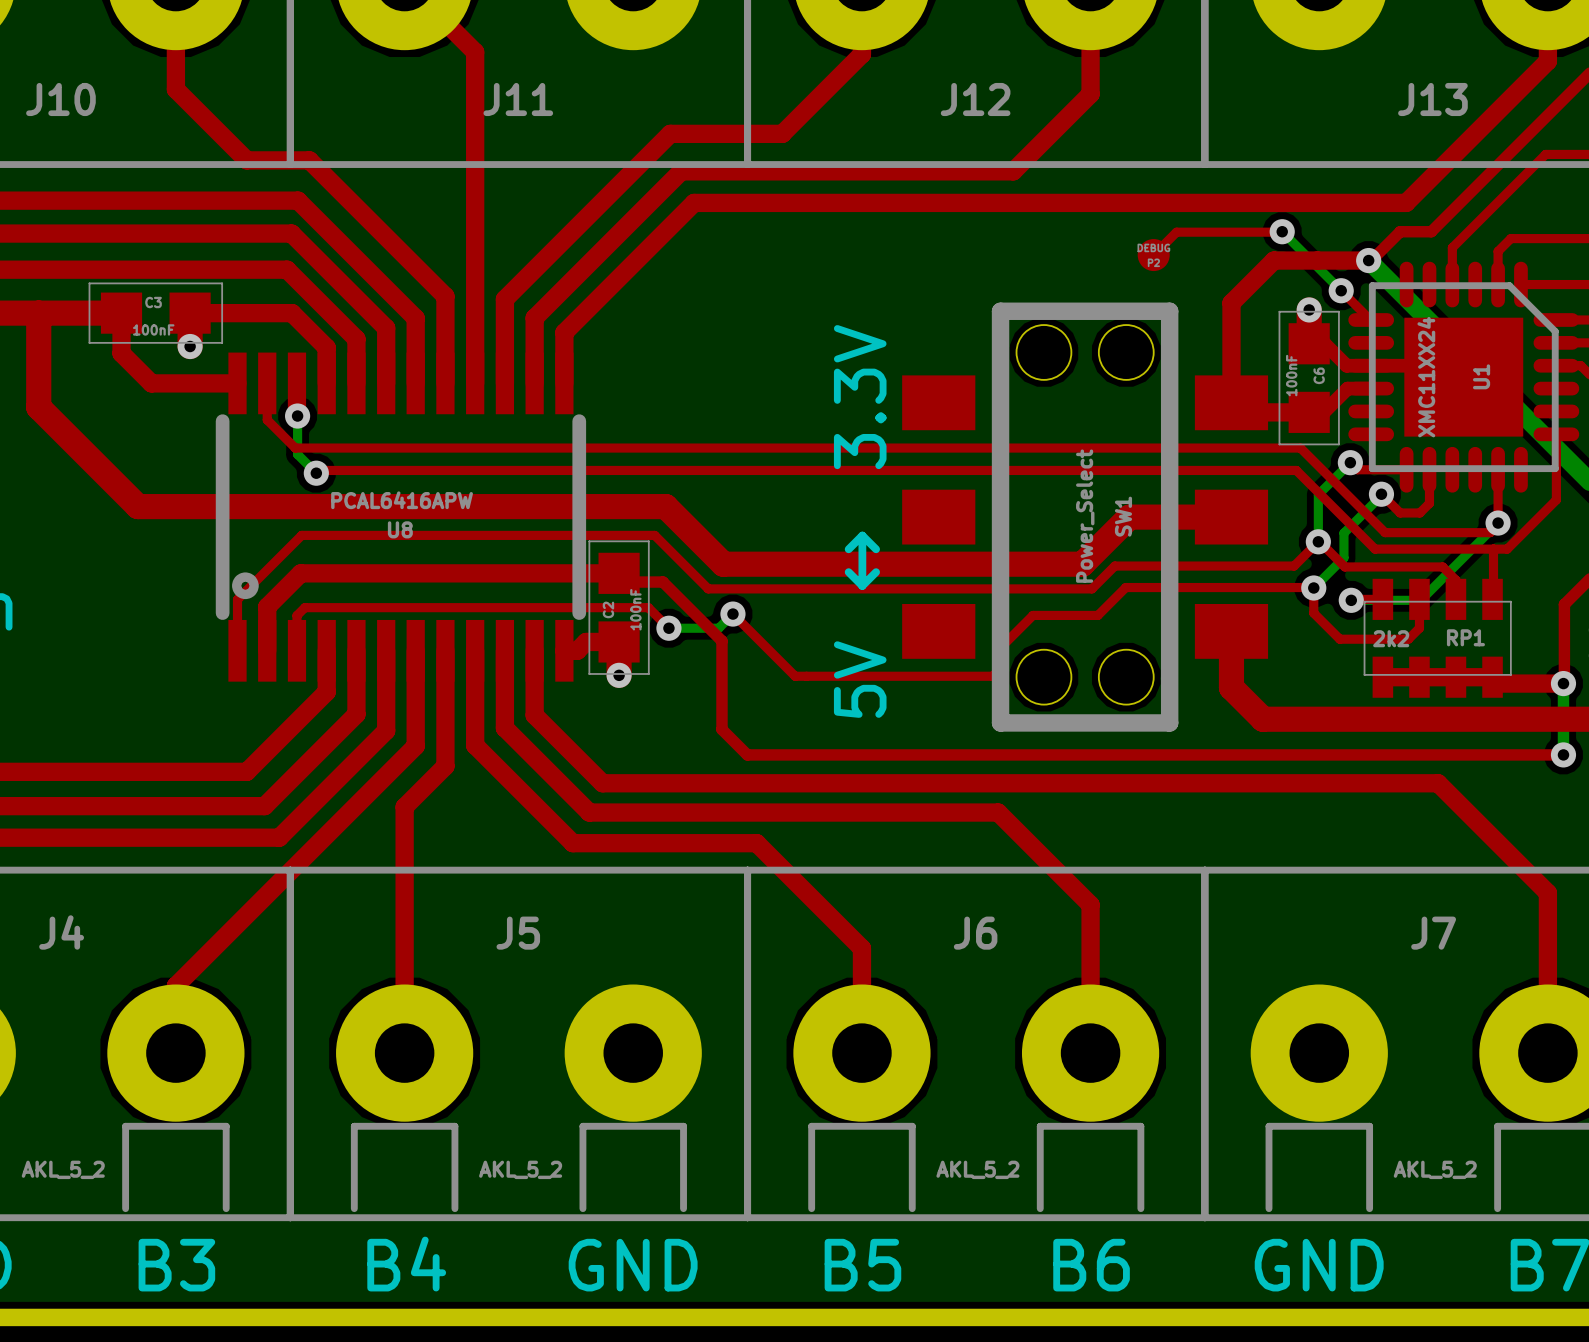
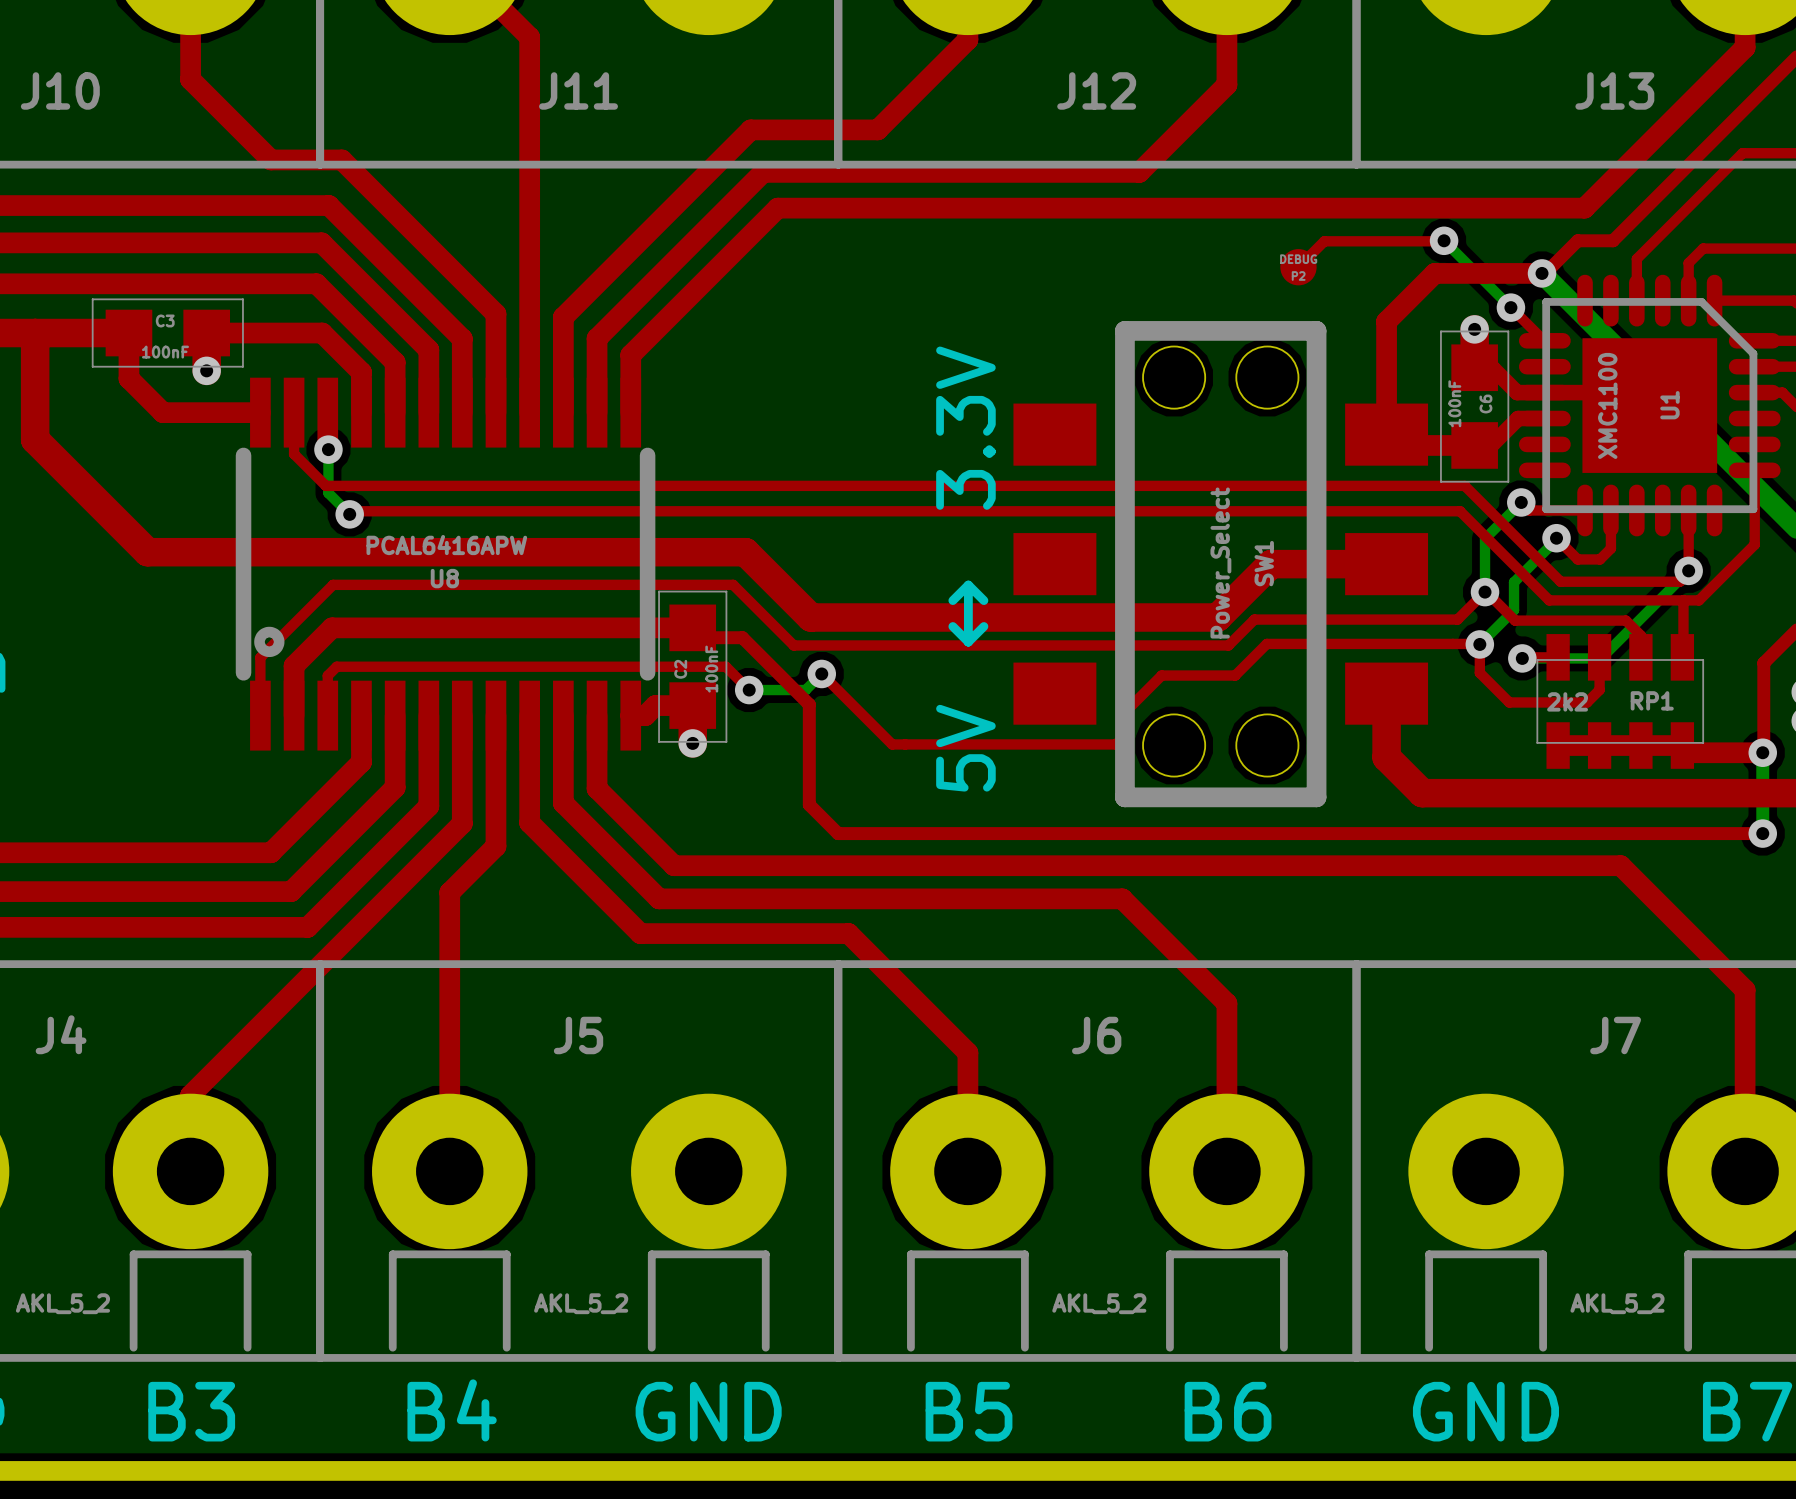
U1 value: XMC11XX24 (1426, 377) -> XMC1100 (1607, 405)

